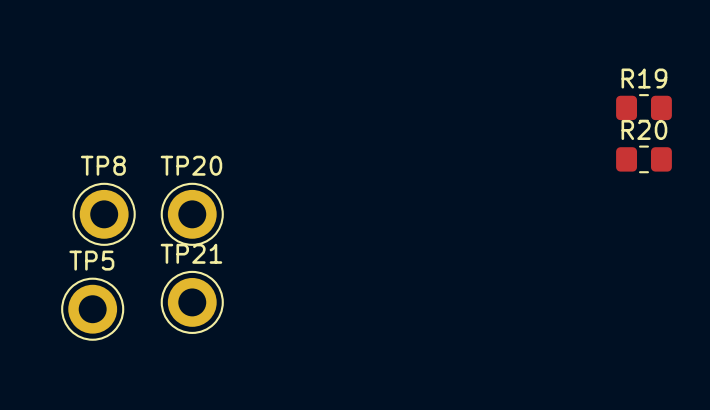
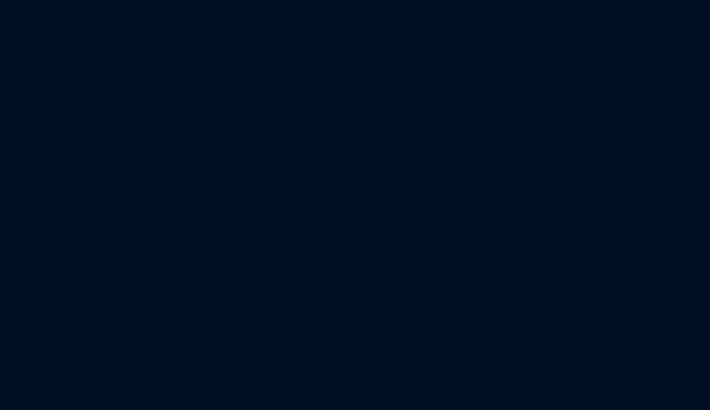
R19: (643, 107) -> none
R20: (643, 159) -> none
TP8: (104, 214) -> none
TP20: (192, 214) -> none
TP21: (192, 302) -> none
TP5: (92, 309) -> none

